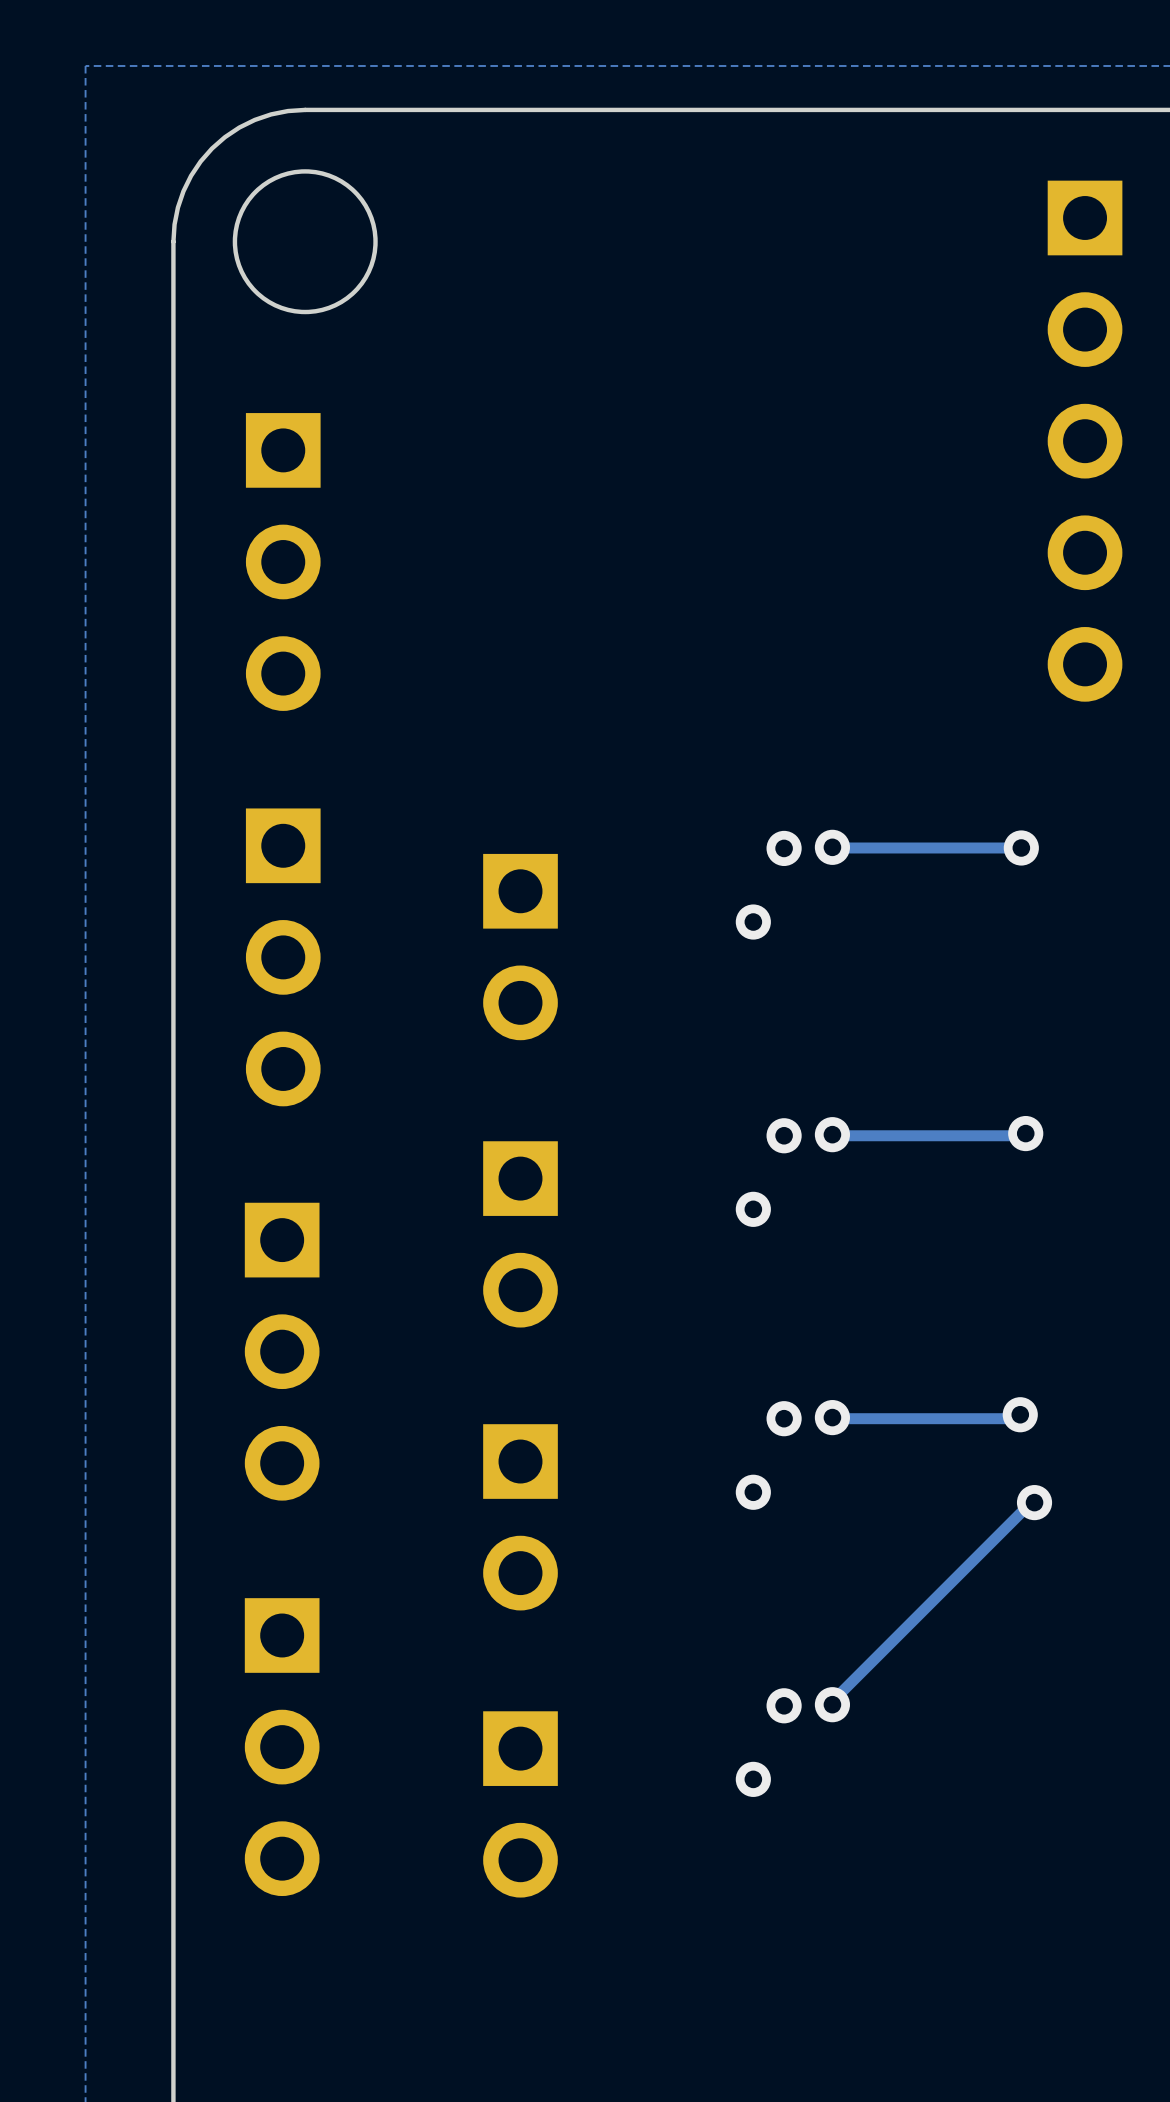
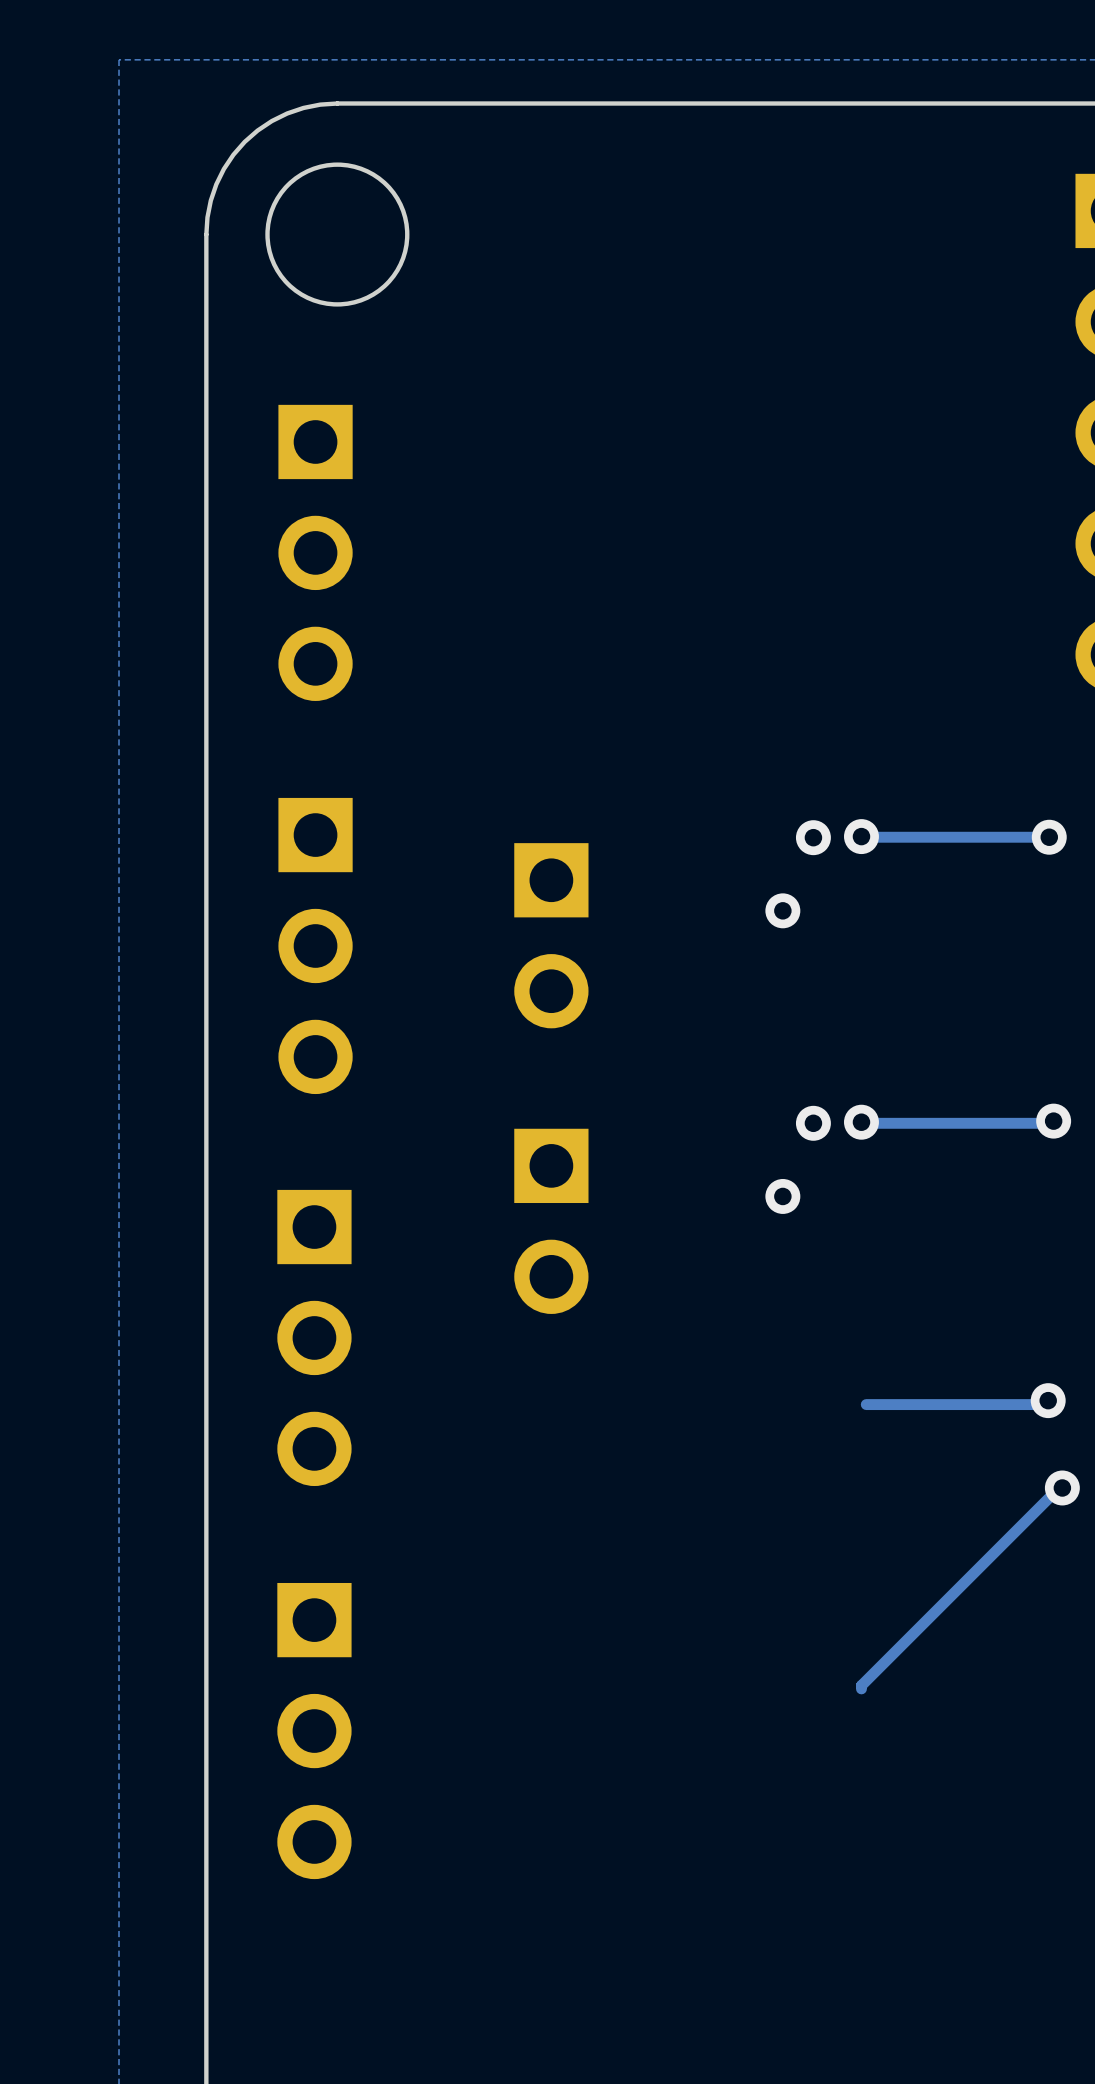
via: (832, 1417) -> none
via: (784, 1418) -> none
via: (753, 1492) -> none
part: (520, 1517) -> none
via: (832, 1704) -> none
via: (784, 1705) -> none
via: (753, 1779) -> none
part: (520, 1804) -> none

